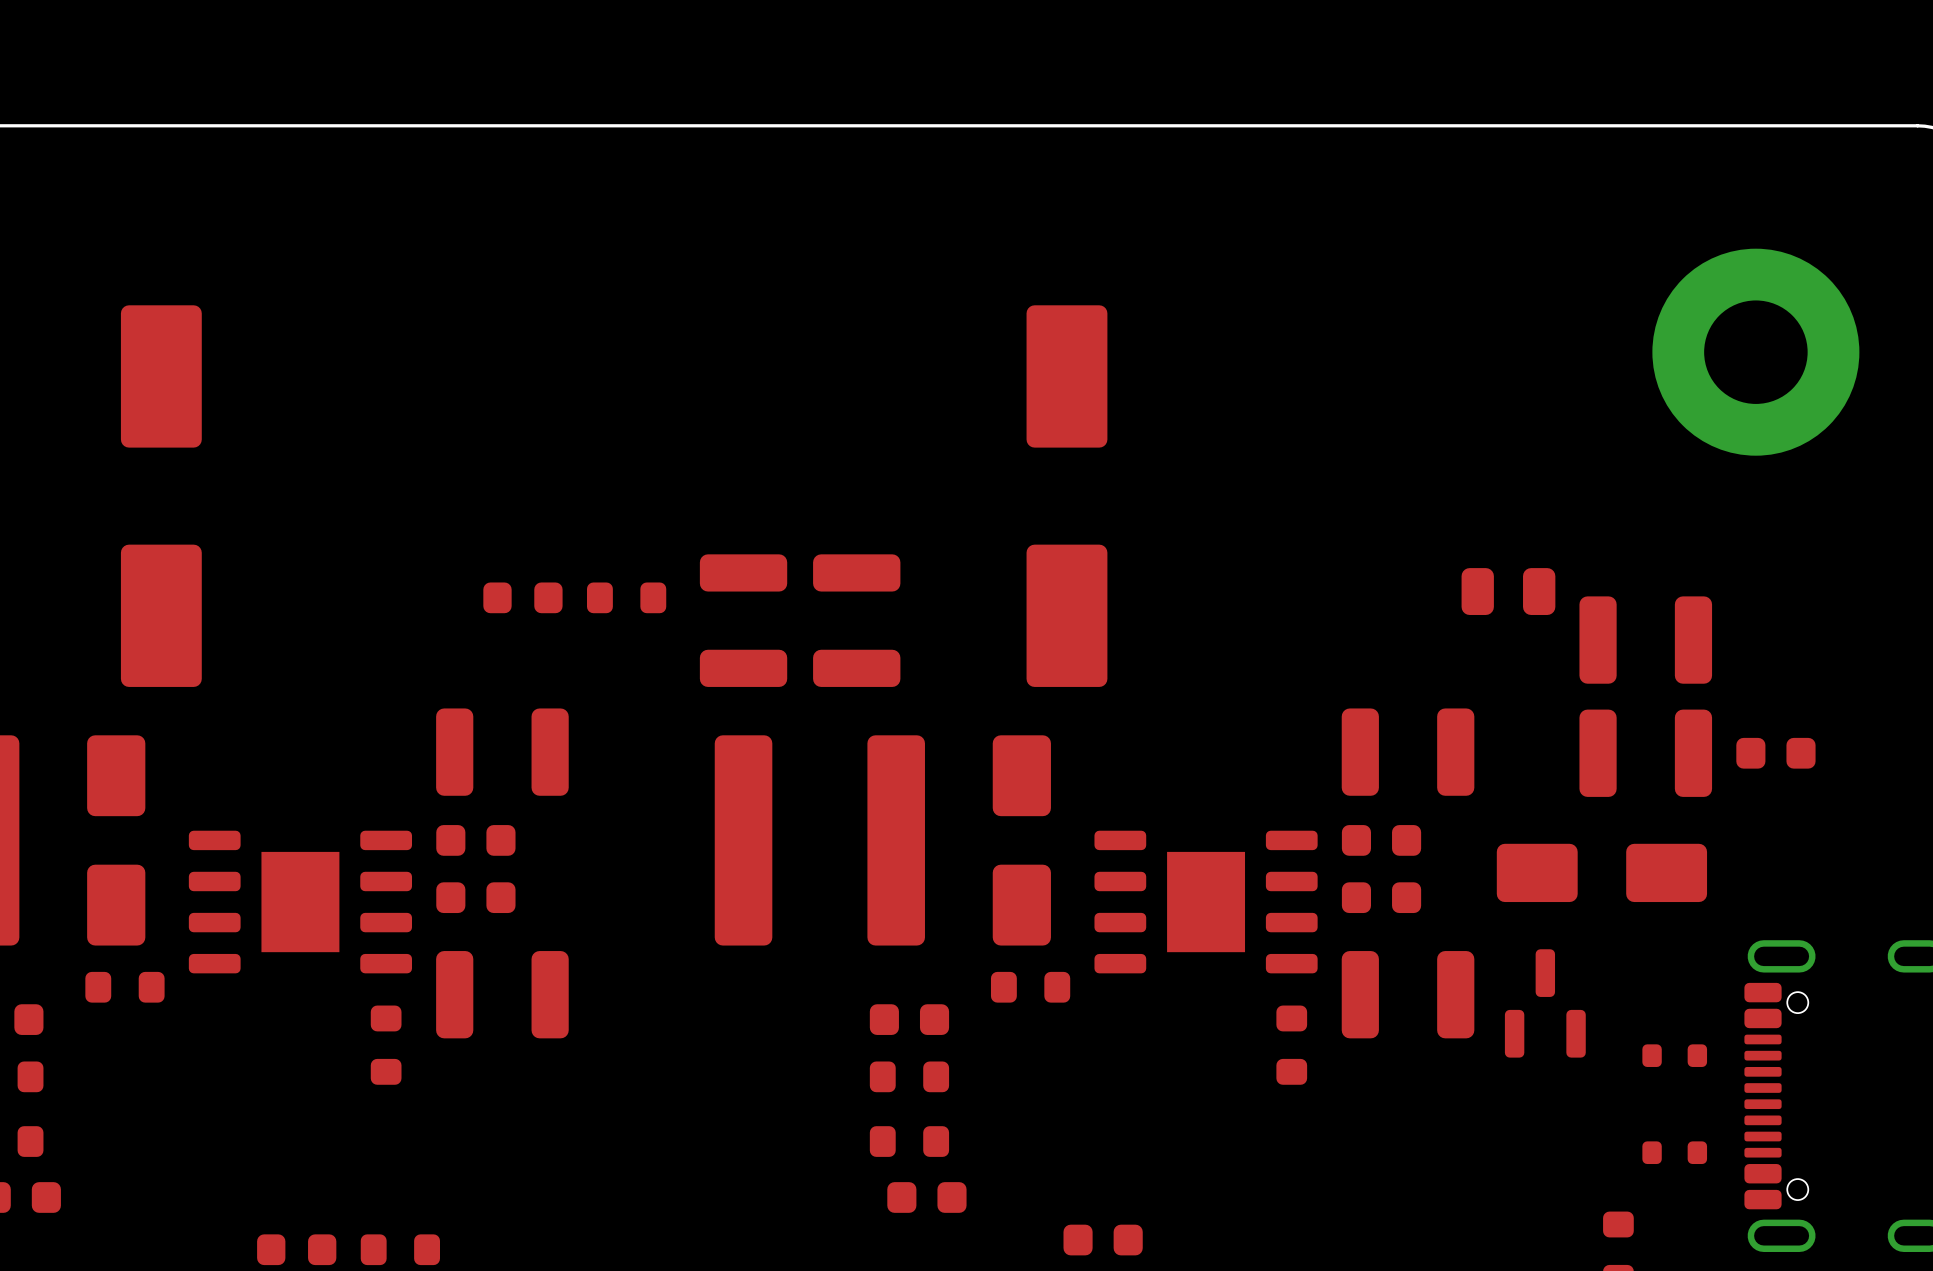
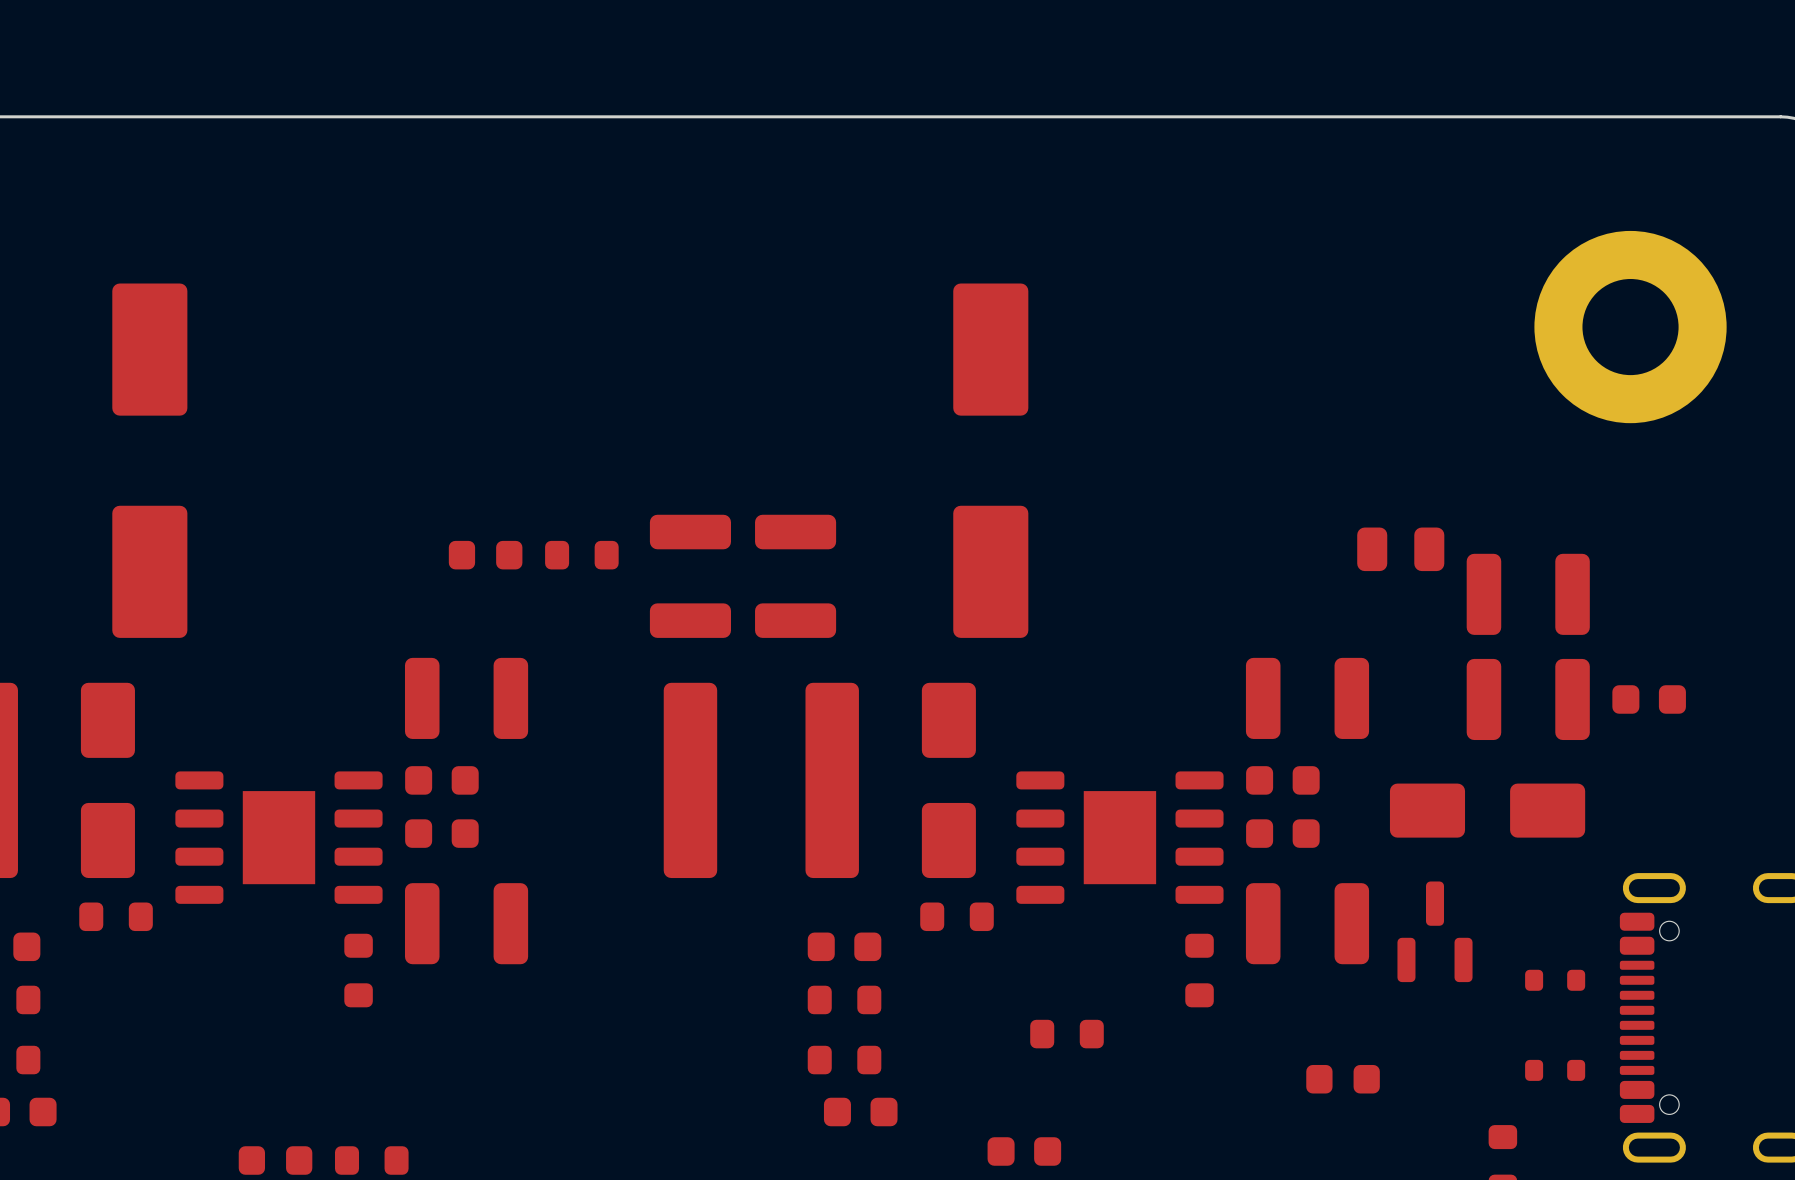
part: none -> (1067, 1034)
part: none -> (1343, 1079)

